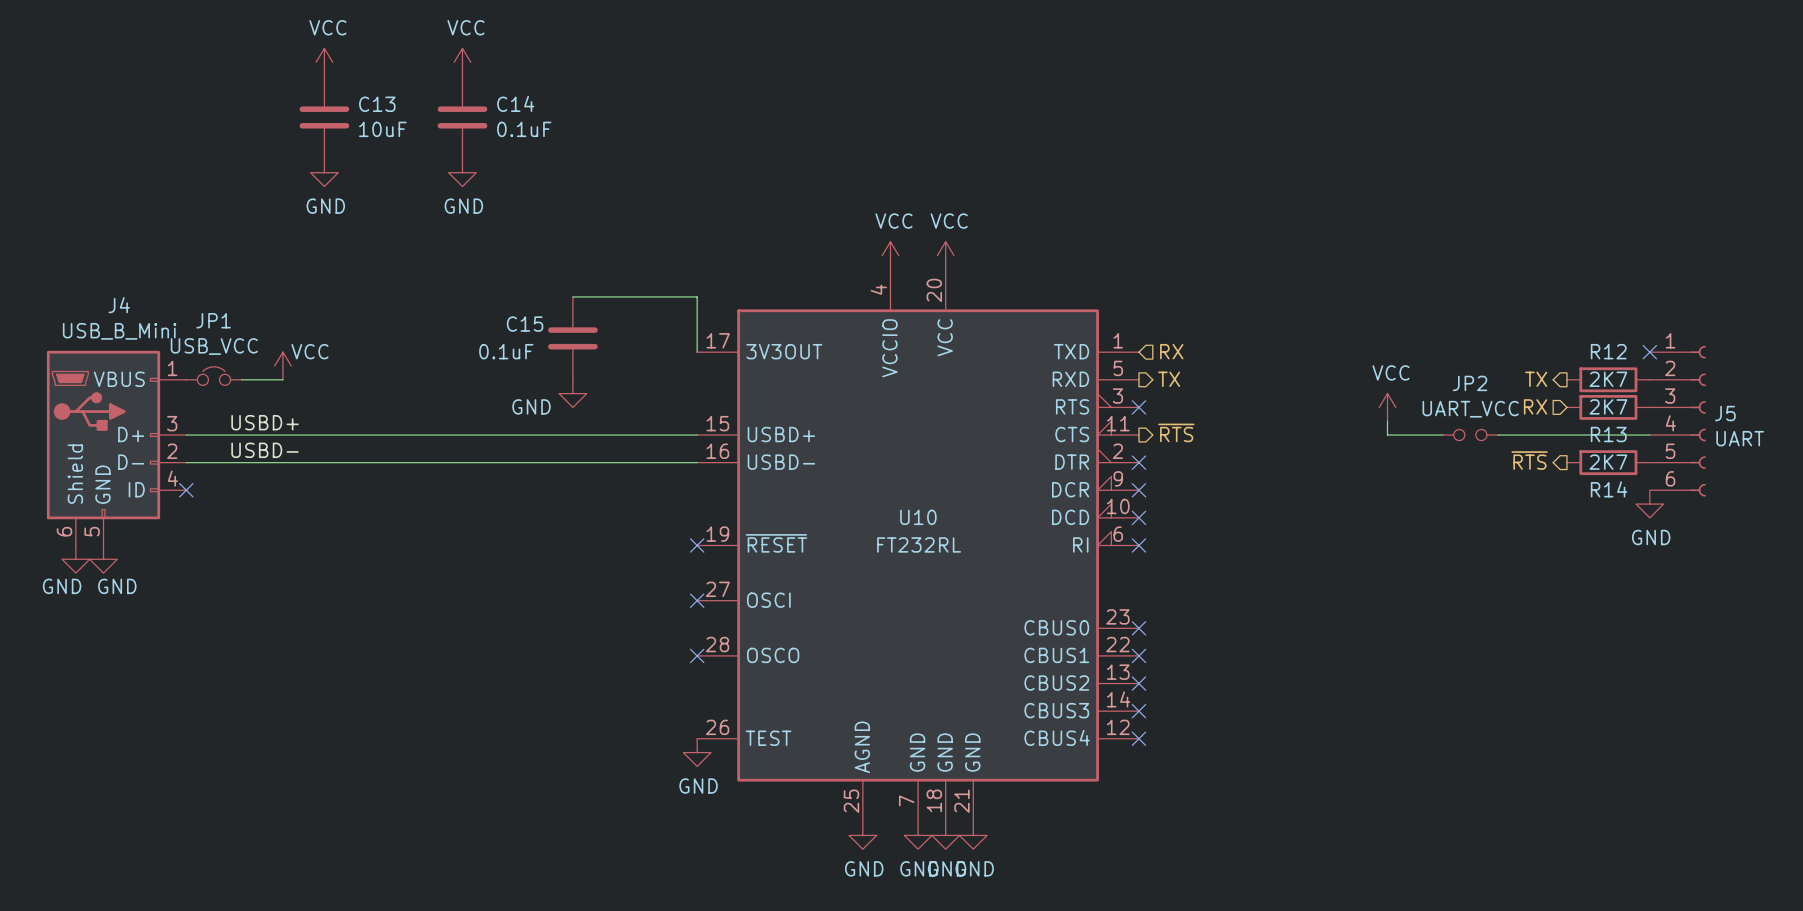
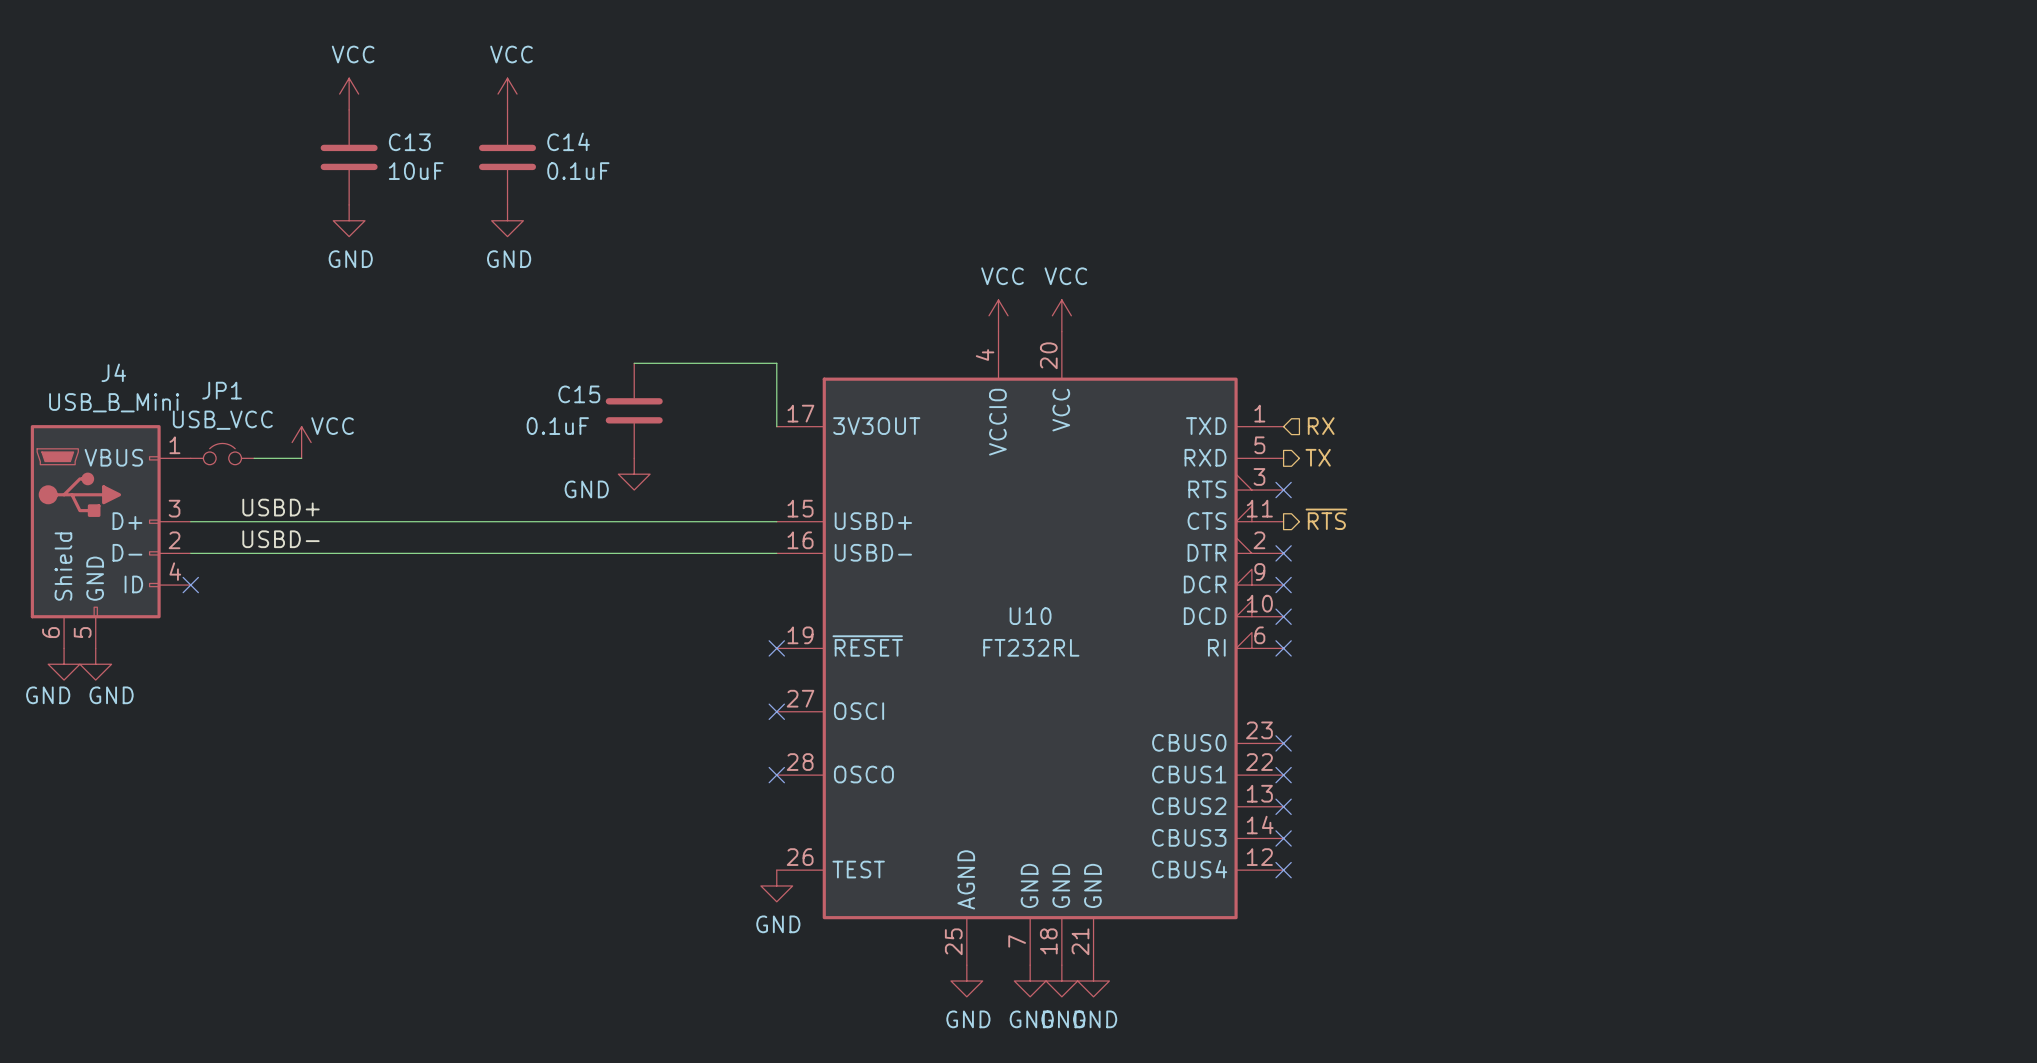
no-connect mark: (1649, 352) -> none
hierarchical label: TX (1536, 379) -> none
R12: 2K7 (1608, 379) -> none
hierarchical label: RX (1535, 406) -> none
power symbol: VCC (1387, 407) -> none
R13: 2K7 (1608, 407) -> none
wire: (1387, 421) (1387, 435) (1442, 435) -> none
J5: UART (1677, 421) -> none
JP2: UART_VCC (1470, 435) -> none
wire: (1497, 435) (1649, 435) -> none
hierarchical label: ~{RTS} (1529, 460) -> none
R14: 2K7 (1608, 462) -> none
power symbol: GND (1649, 504) -> none

